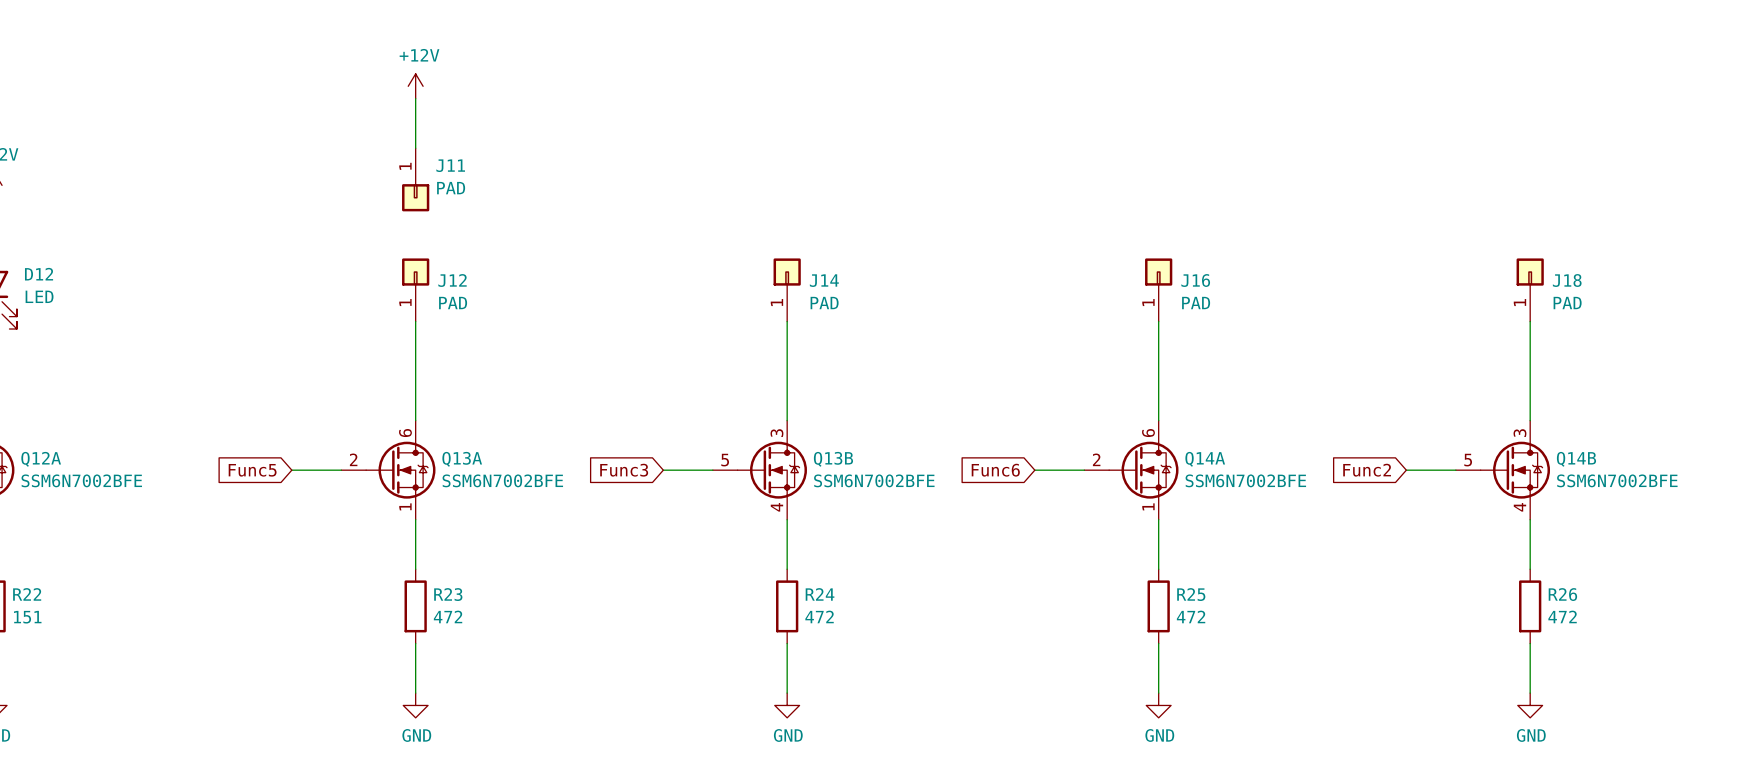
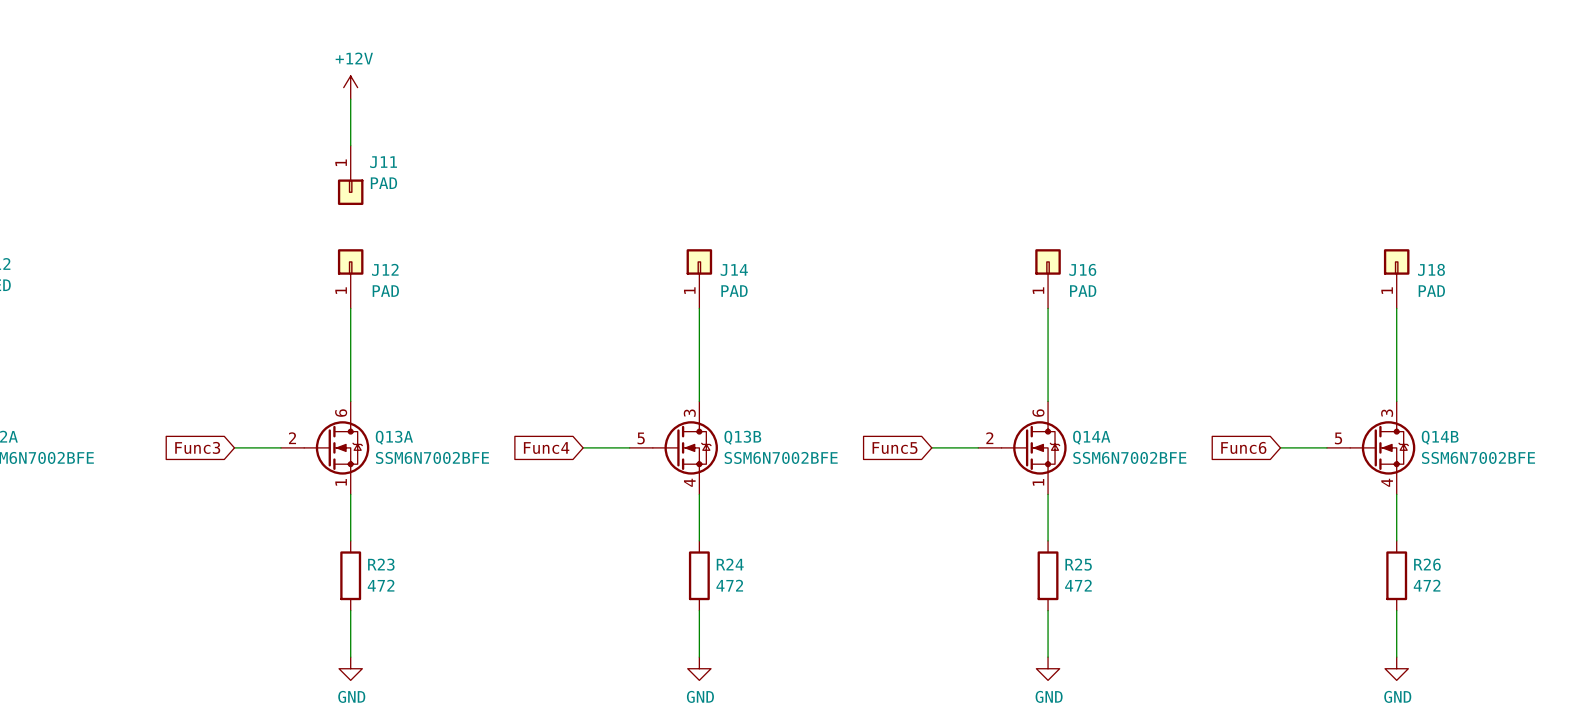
global label: Func5 (252, 470) -> Func3 (197, 447)
global label: Func3 (624, 470) -> Func4 (546, 448)
global label: Func6 (995, 470) -> Func5 (895, 448)
global label: Func2 (1367, 470) -> Func6 (1243, 447)

